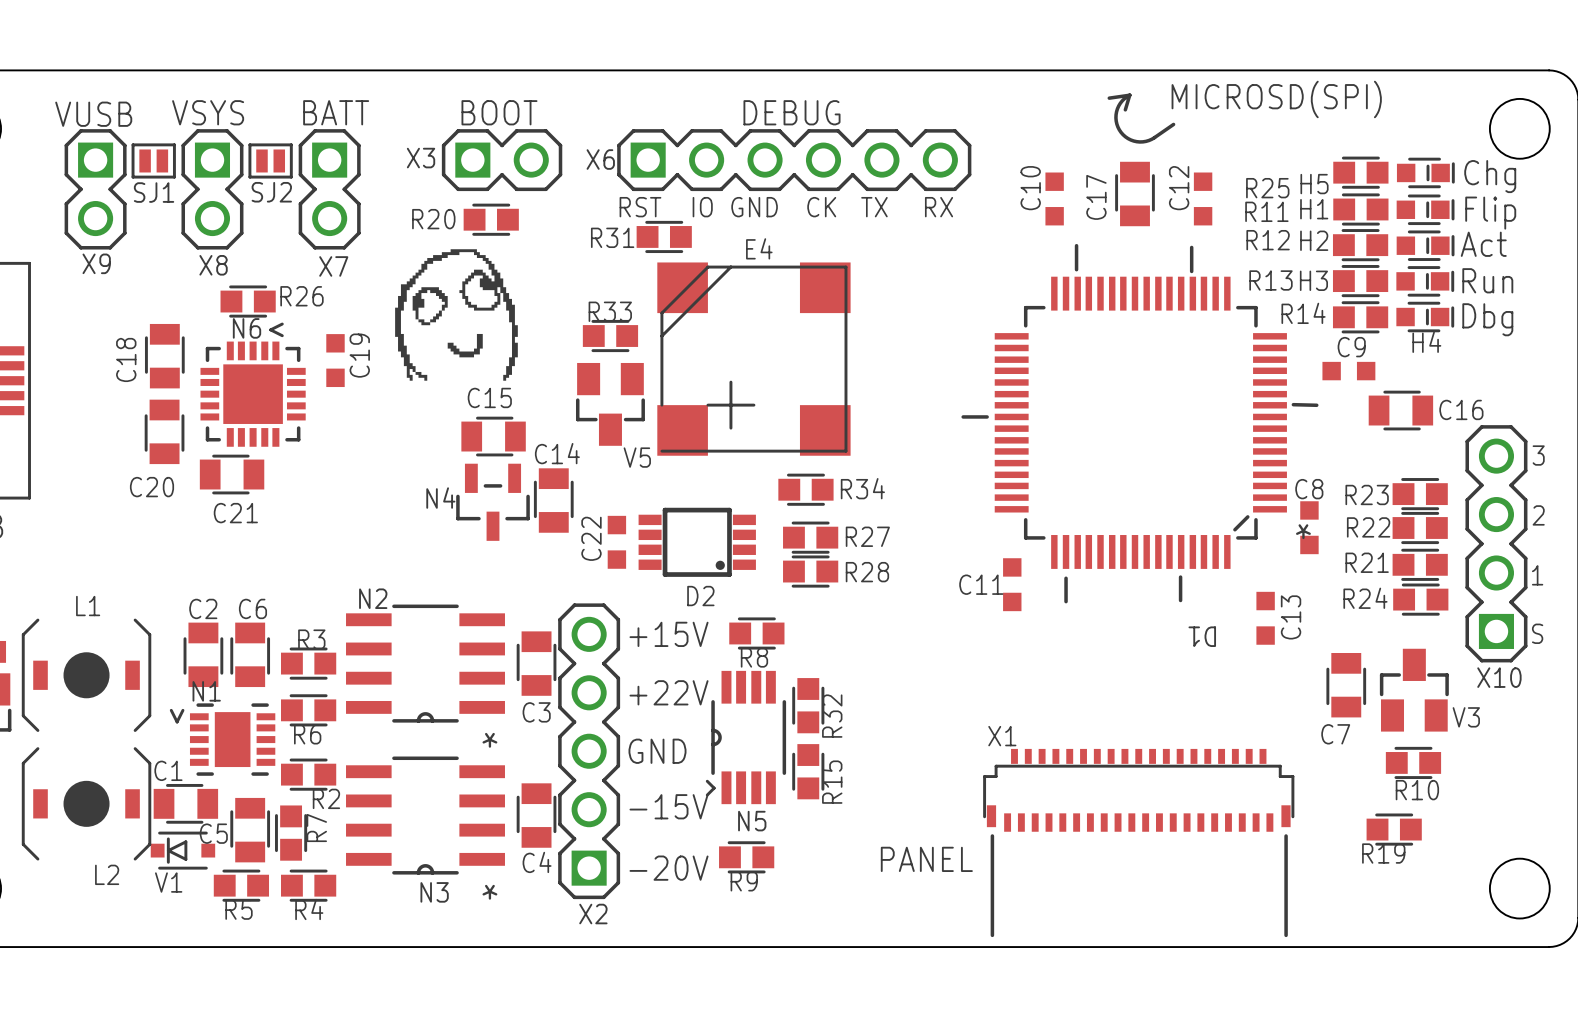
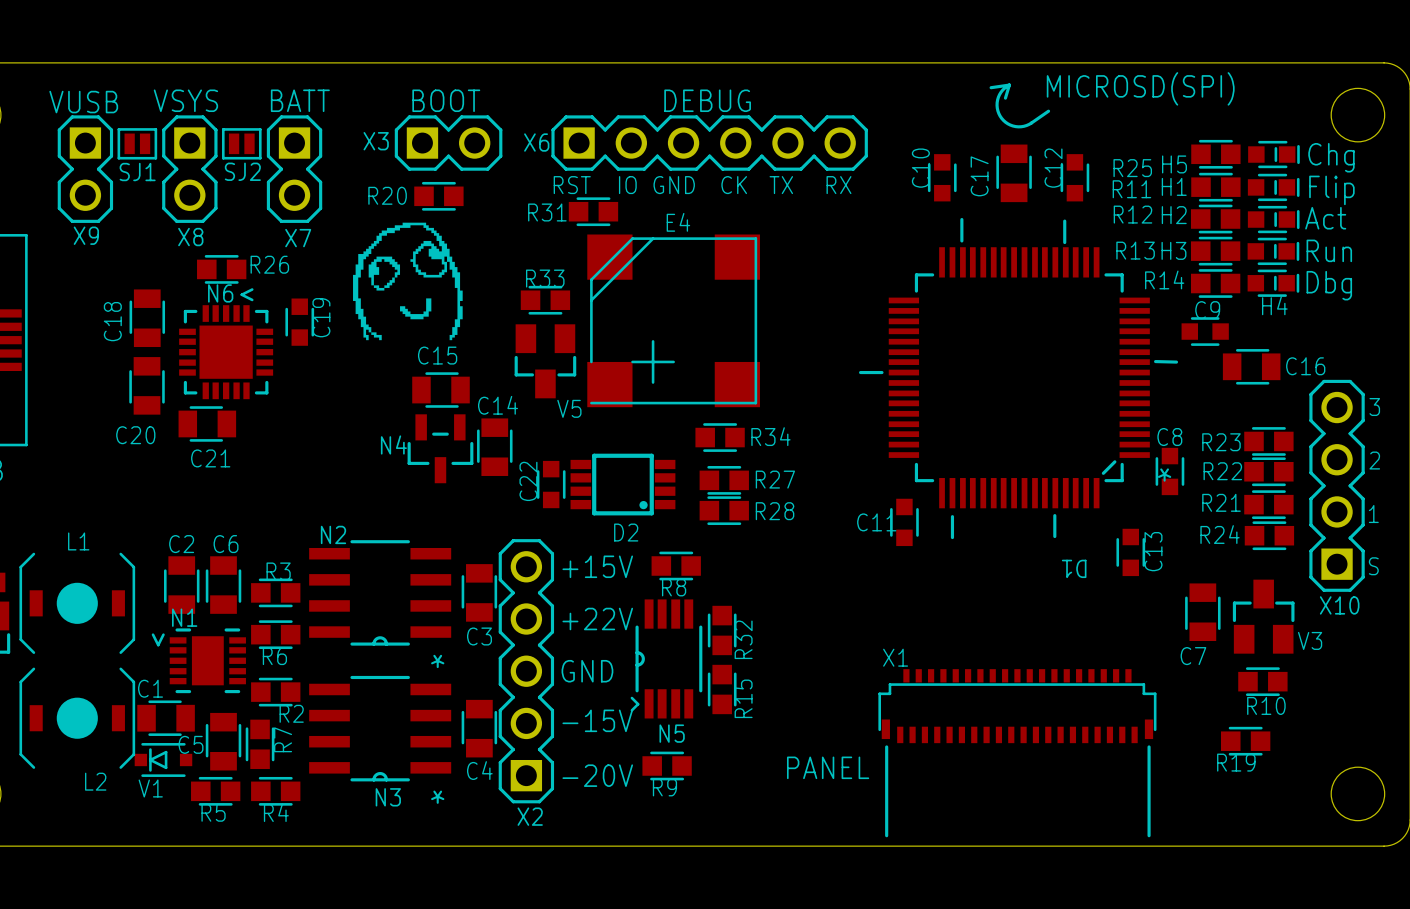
C10 footprint: [1045, 172, 1064, 226] -> [927, 154, 957, 202]
C12 footprint: [1193, 172, 1213, 226] -> [1060, 154, 1090, 202]
C19 footprint: [326, 334, 345, 388] -> [285, 298, 315, 346]
C9 footprint: [1322, 361, 1376, 381] -> [1181, 317, 1229, 346]
C8 footprint: [1300, 501, 1319, 555] -> [1155, 447, 1185, 496]
C22 footprint: [607, 515, 627, 569] -> [536, 460, 566, 509]
C11 footprint: [1003, 558, 1022, 612] -> [890, 498, 919, 547]
C13 footprint: [1256, 591, 1275, 645] -> [1116, 528, 1146, 577]

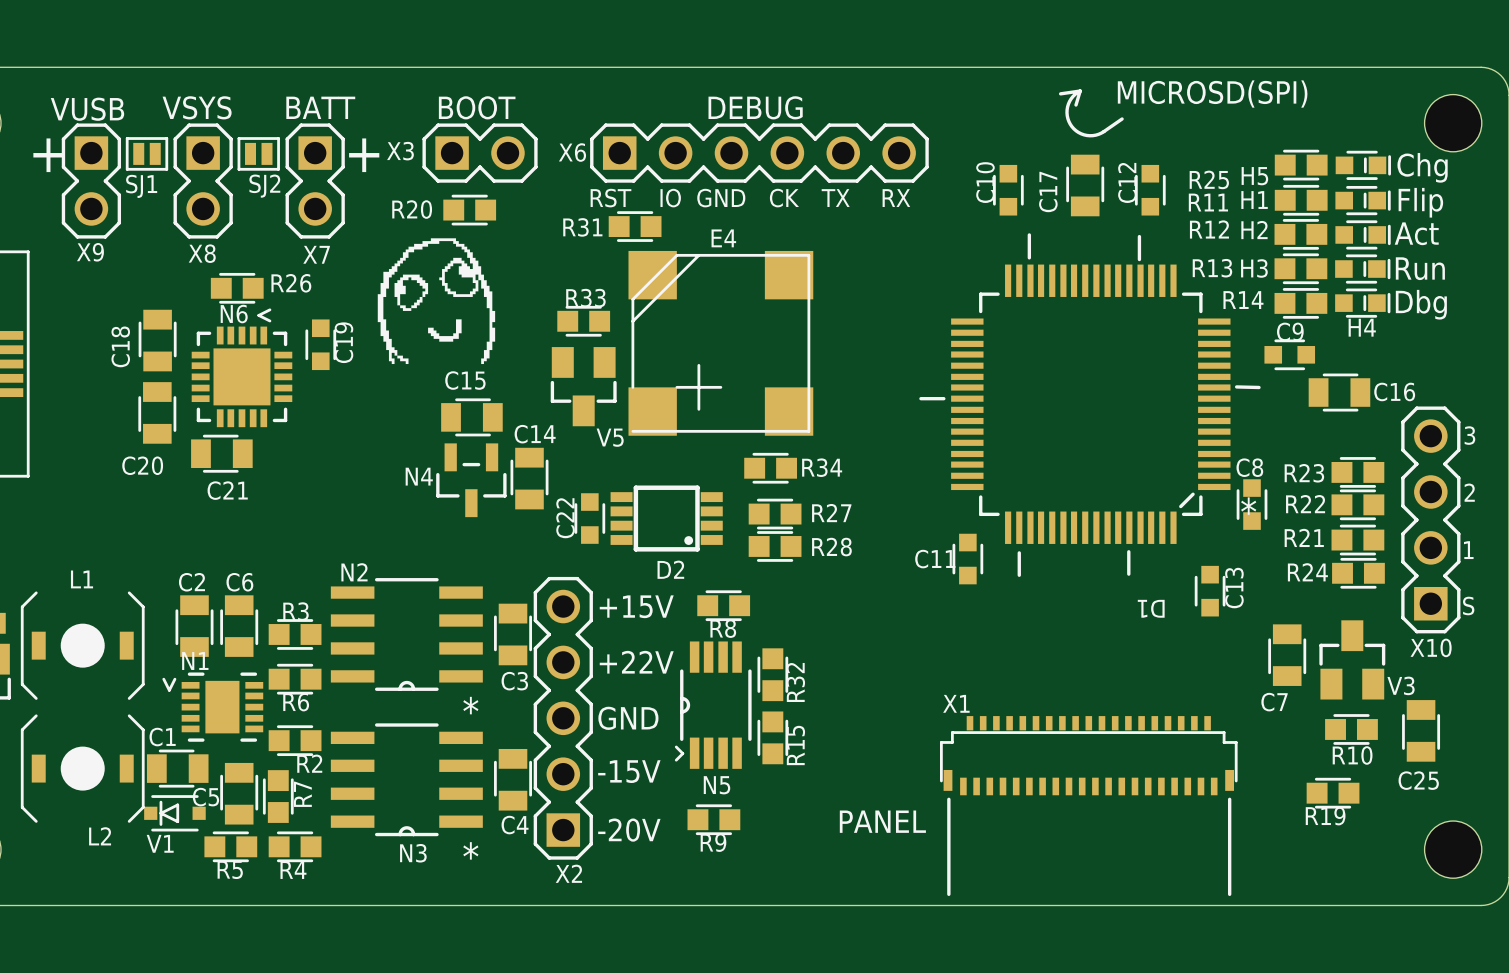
text: none -> + (48, 155)
text: none -> + (364, 155)
C25: none -> (1421, 730)

